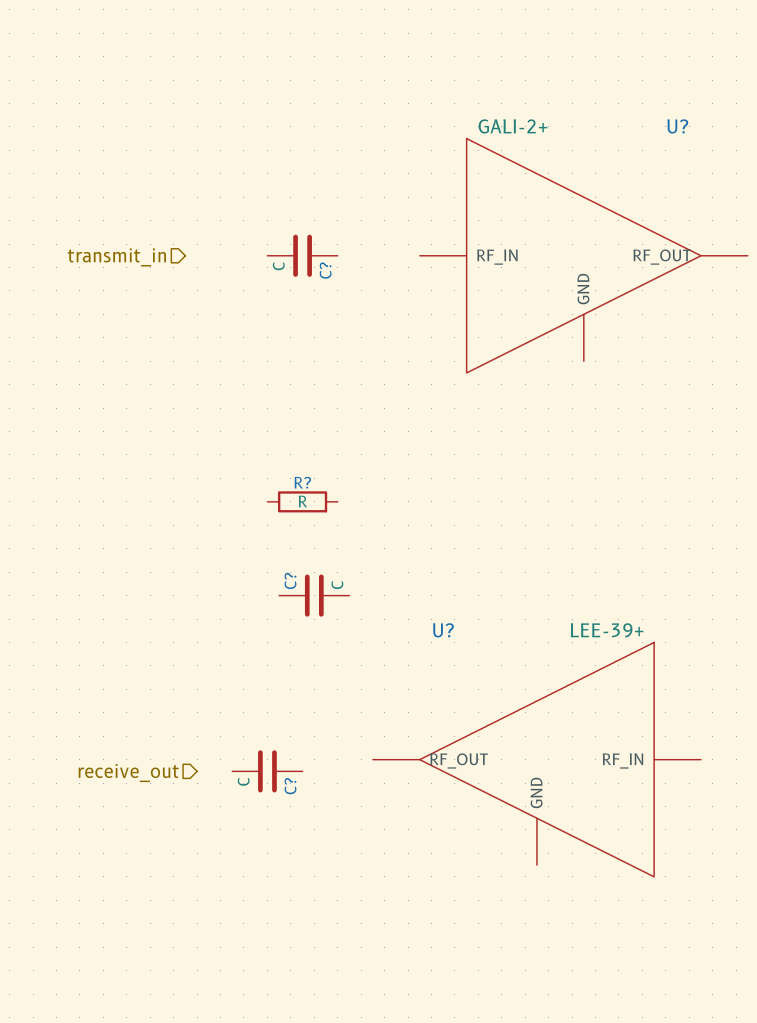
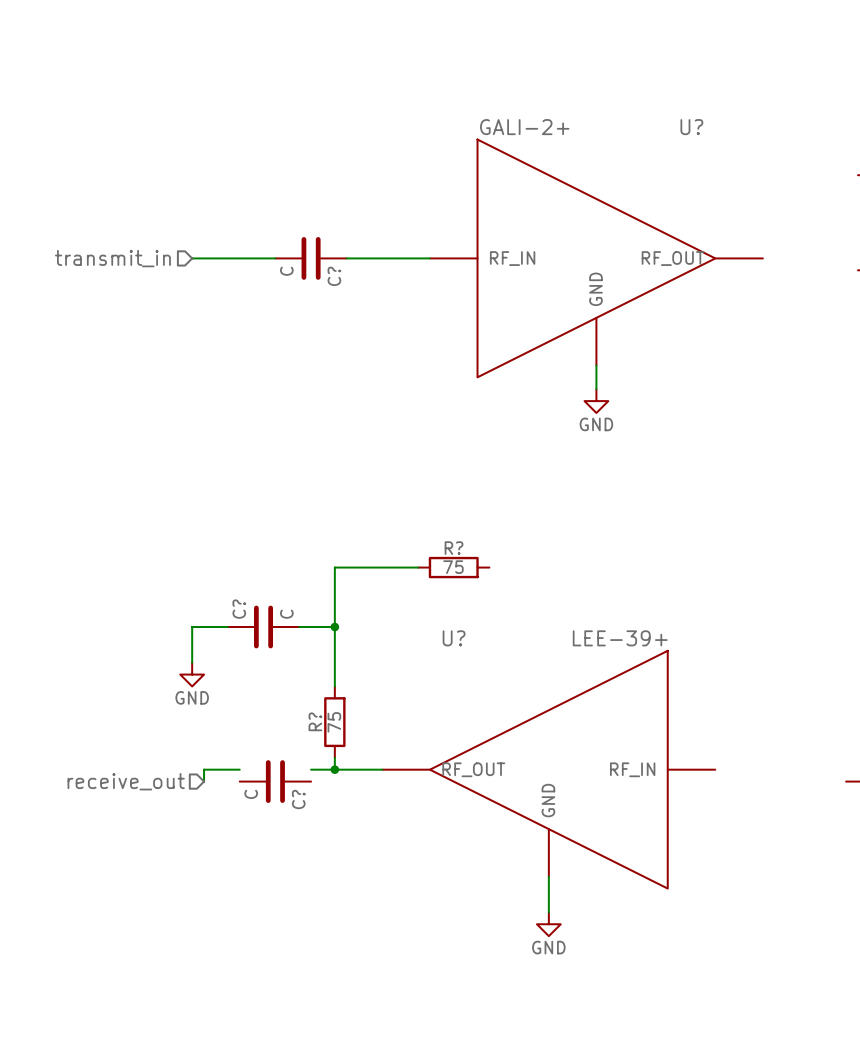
wire: none -> (192, 258) (275, 258)
wire: none -> (346, 258) (429, 258)
wire: none -> (596, 365) (596, 389)
power symbol: none -> GND (596, 401)
R?: R (302, 501) -> none
wire: none -> (418, 567) (334, 567) (334, 686)
R?: none -> 75 (453, 567)
C? position: (314, 595) -> (263, 627)
wire: none -> (227, 627) (192, 627) (192, 662)
wire: none -> (299, 627) (334, 627)
junction: none -> (334, 627)
power symbol: none -> GND (192, 674)
R?: none -> 75 (334, 722)
wire: none -> (334, 757) (334, 769)
wire: none -> (239, 769) (204, 769) (204, 781)
wire: none -> (311, 769) (382, 769)
junction: none -> (334, 769)
wire: none -> (548, 876) (548, 912)
power symbol: none -> GND (548, 924)

